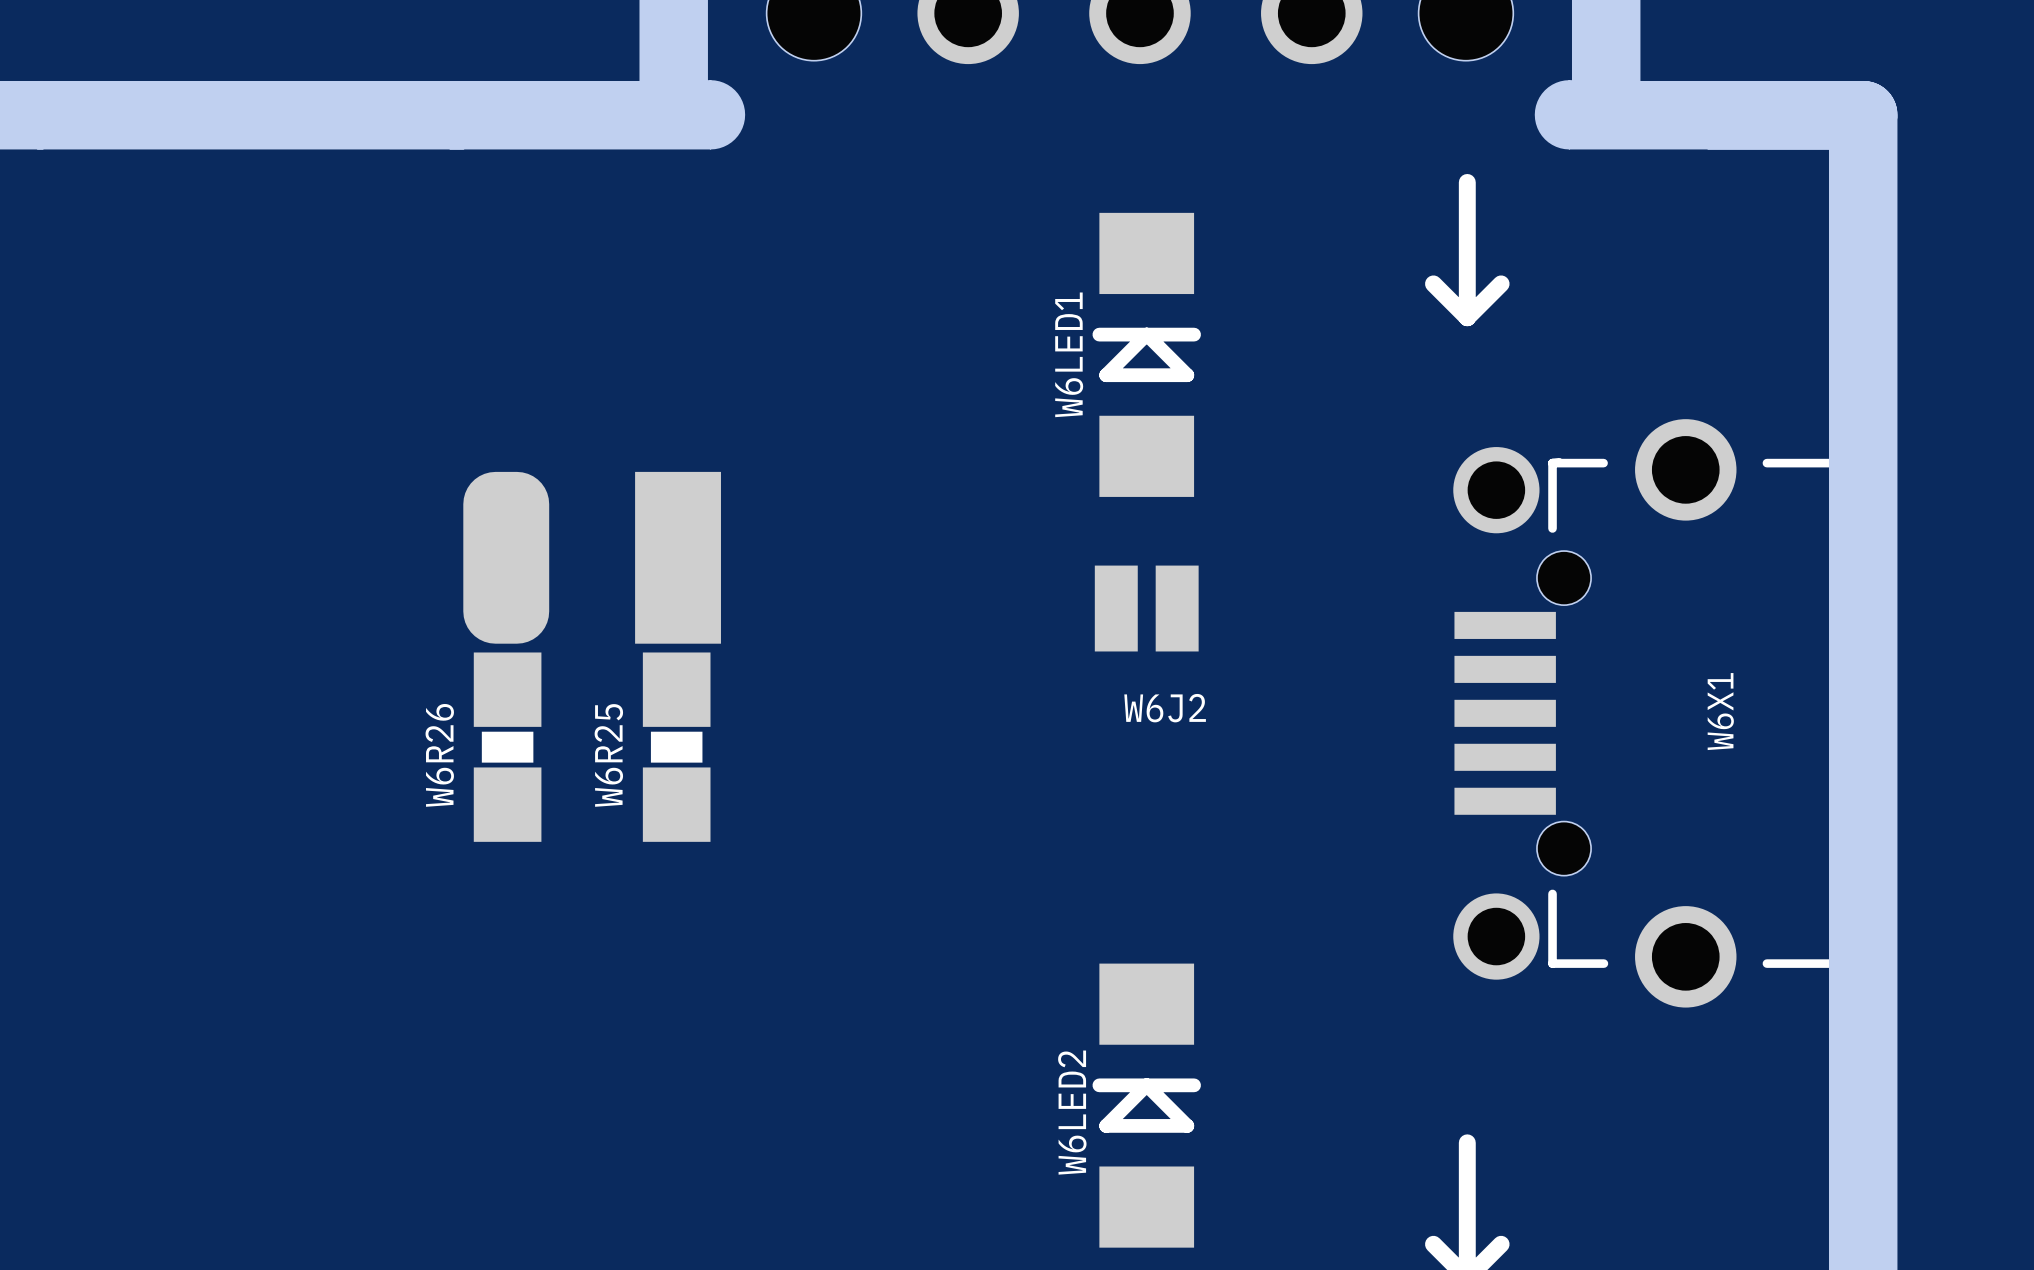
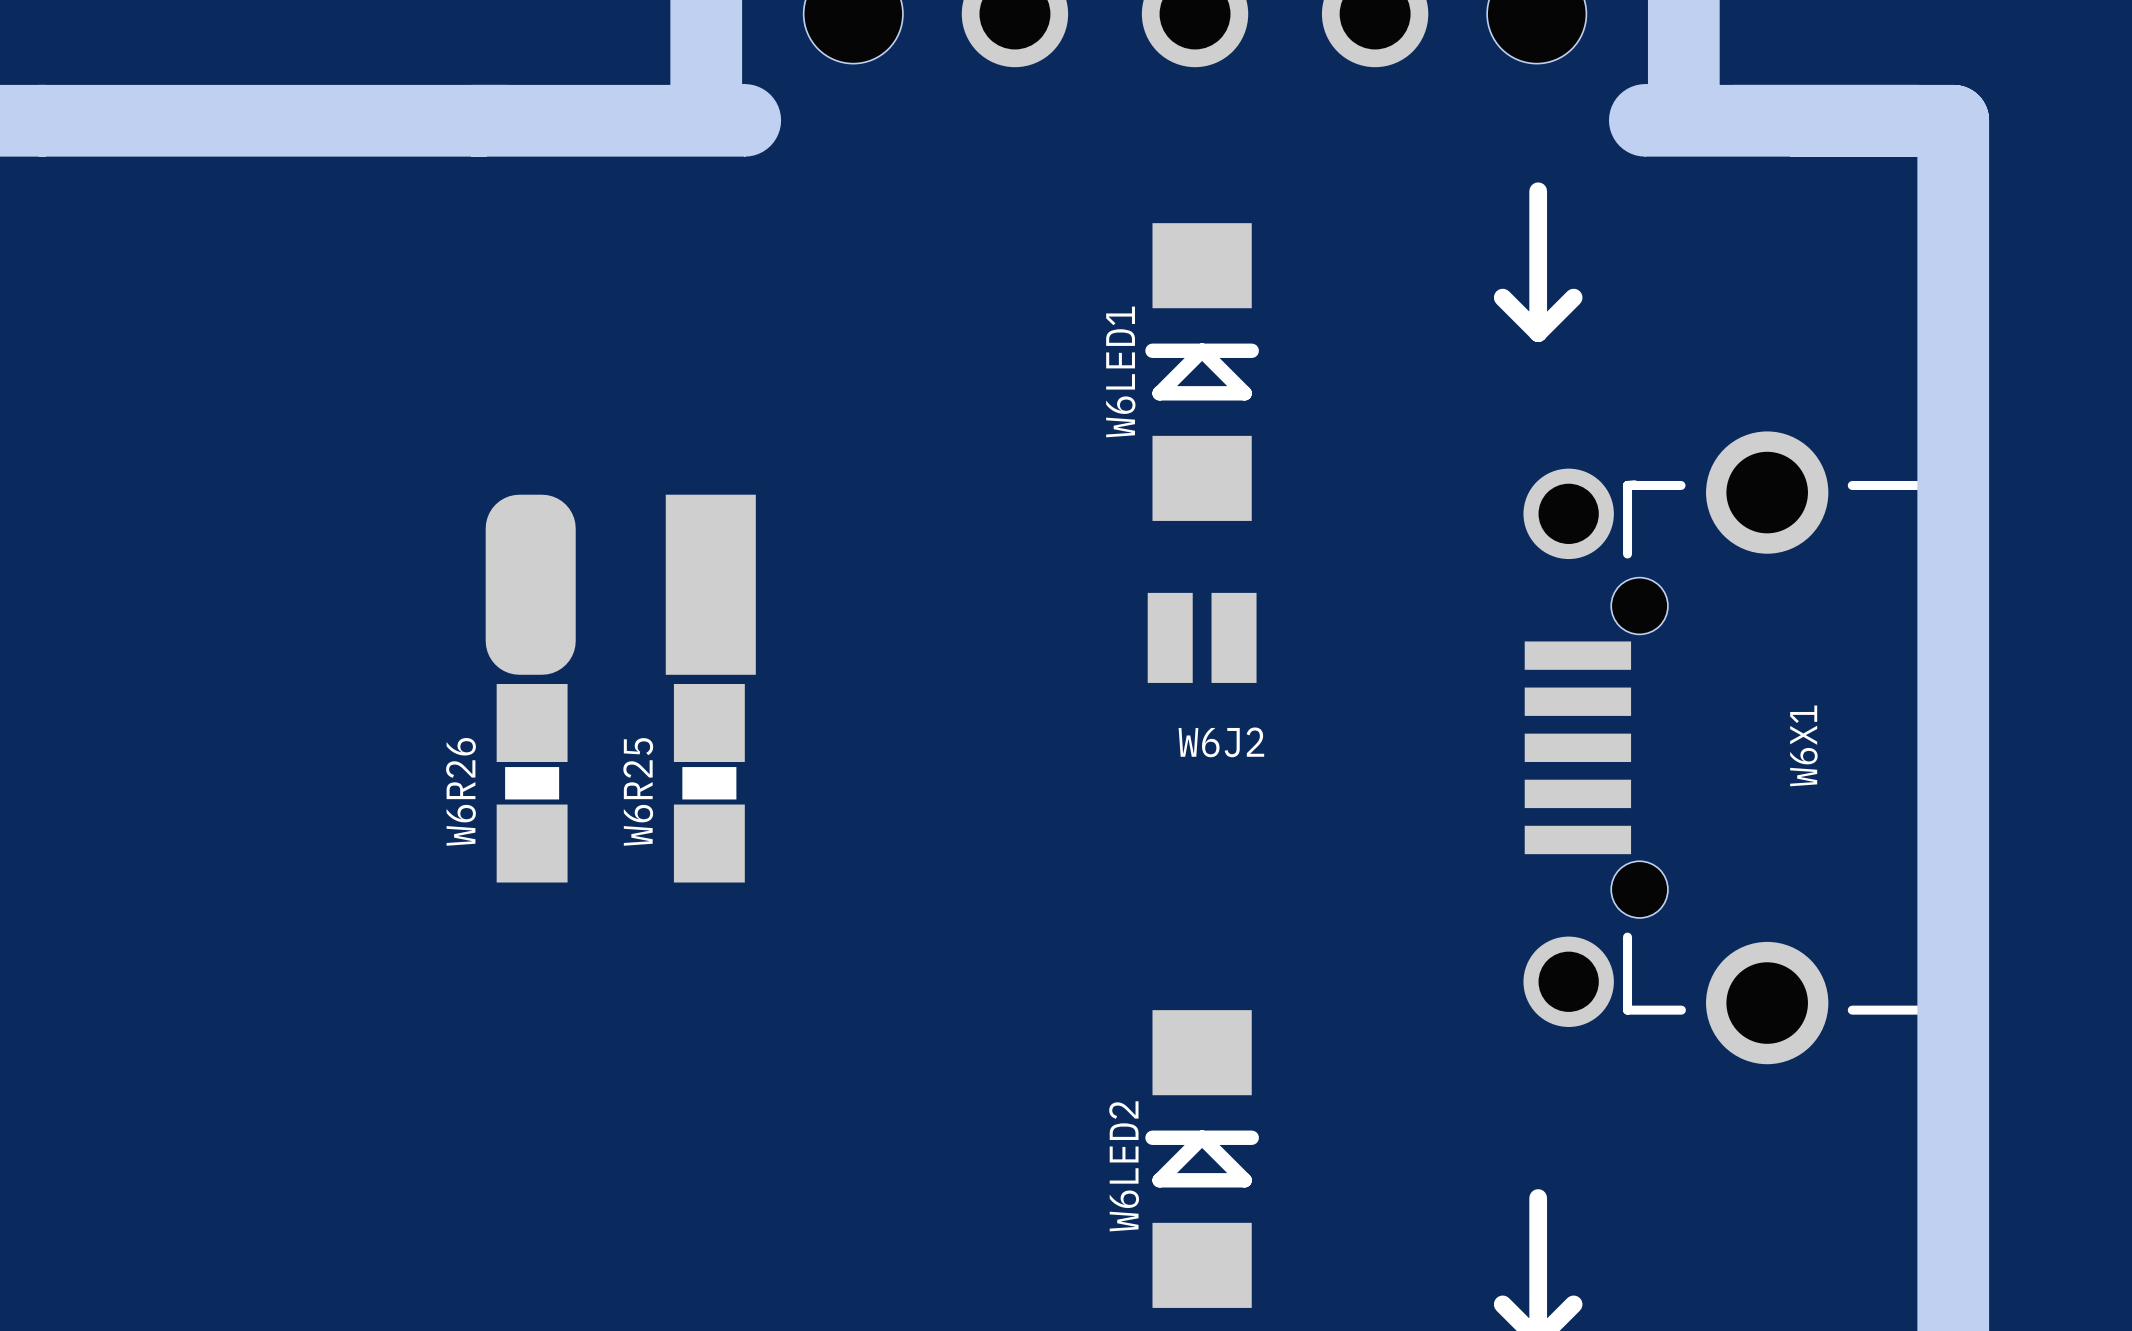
W6X1 footprint: [1453, 419, 1884, 1008] -> [1523, 431, 1975, 1065]

